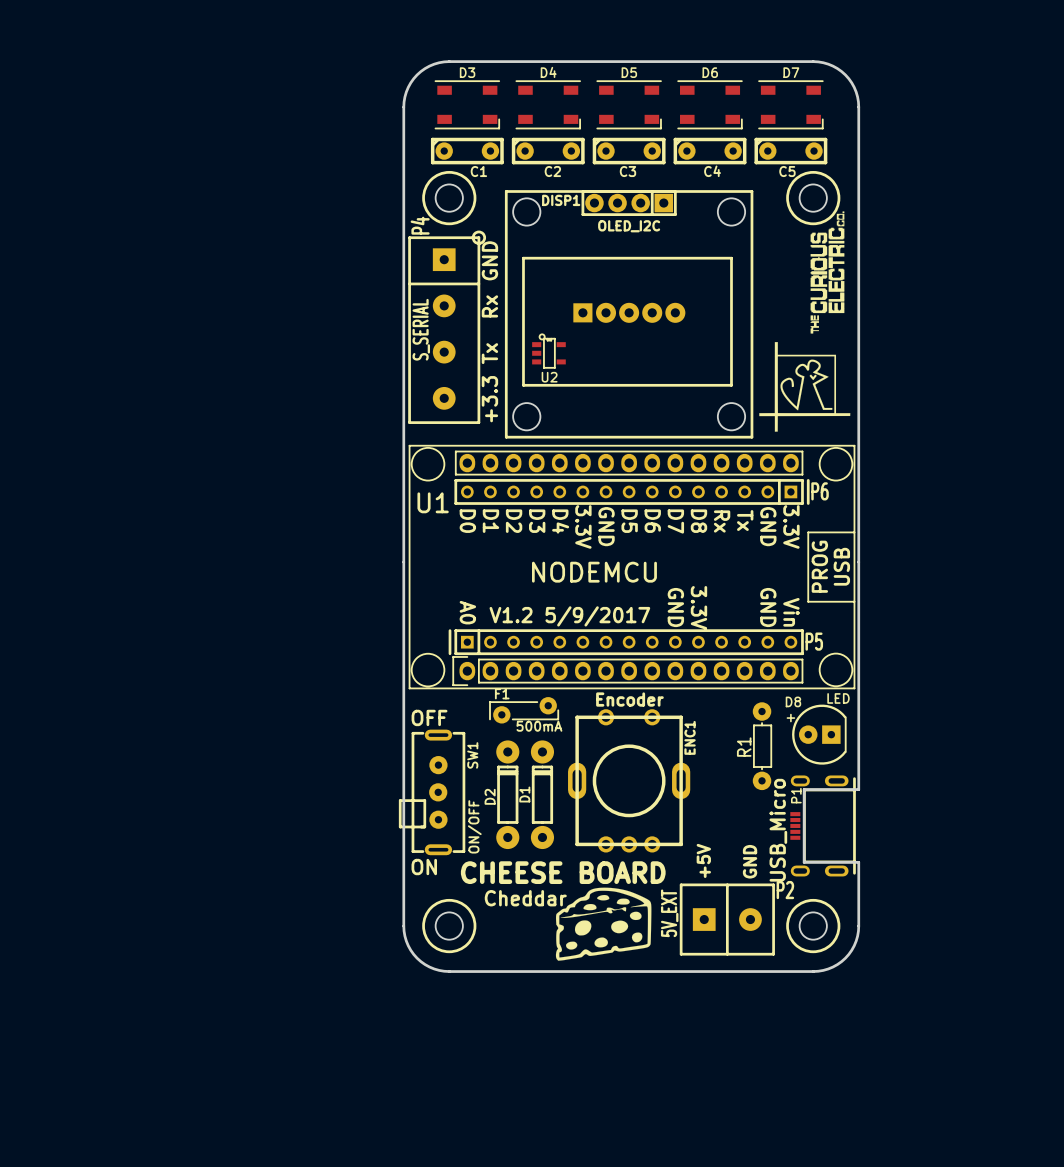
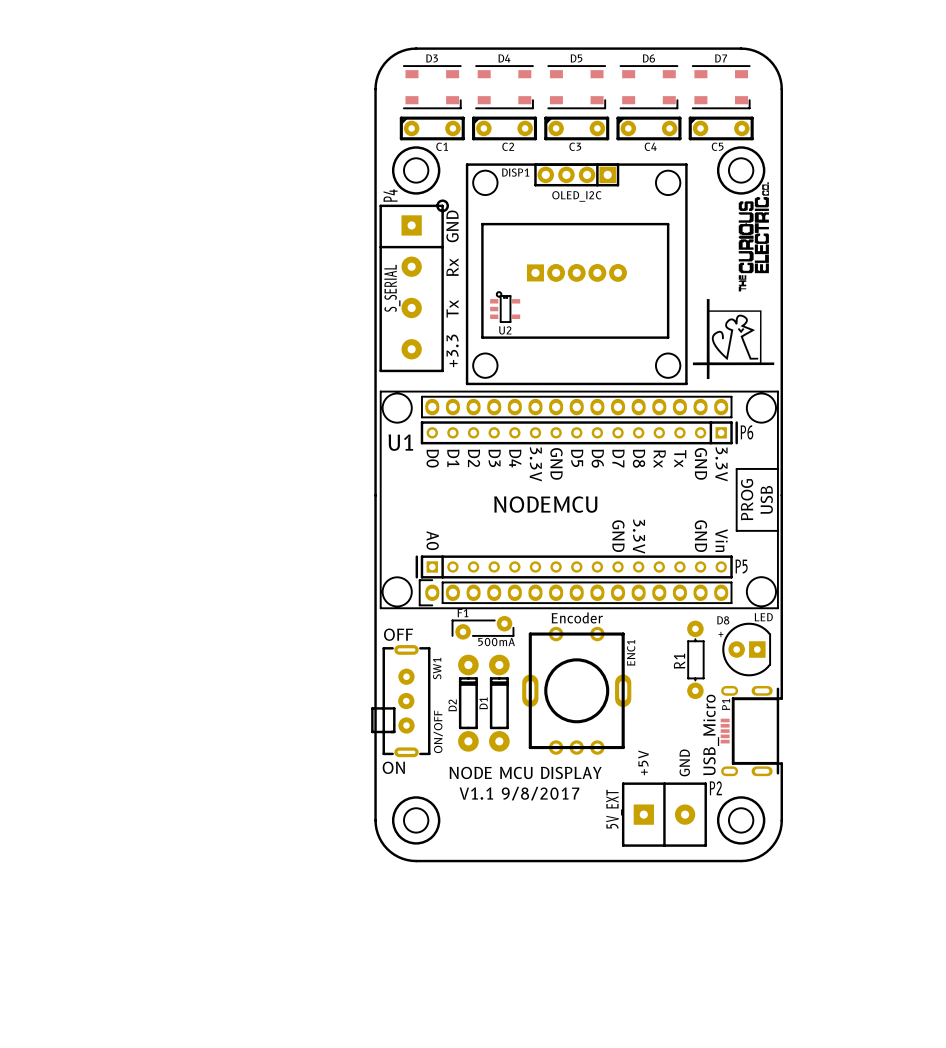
text: V1.2 5/9/2017 (569, 616) -> none
text: CHEESE BOARD (563, 872) -> NODE MCU DISPLAY (525, 772)
drawing: [555, 887, 652, 961] -> none
text: none -> V1.1 9/8/2017 (519, 793)
text: Cheddar (525, 898) -> none

